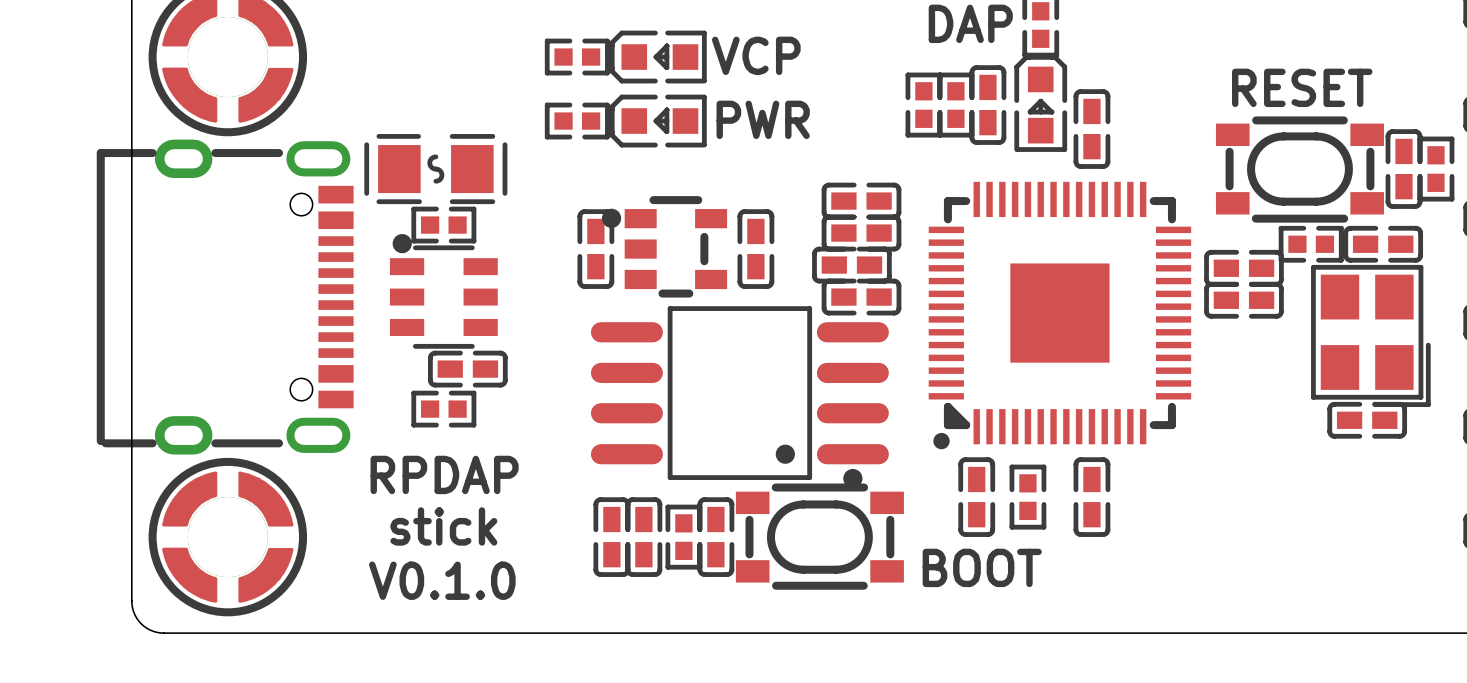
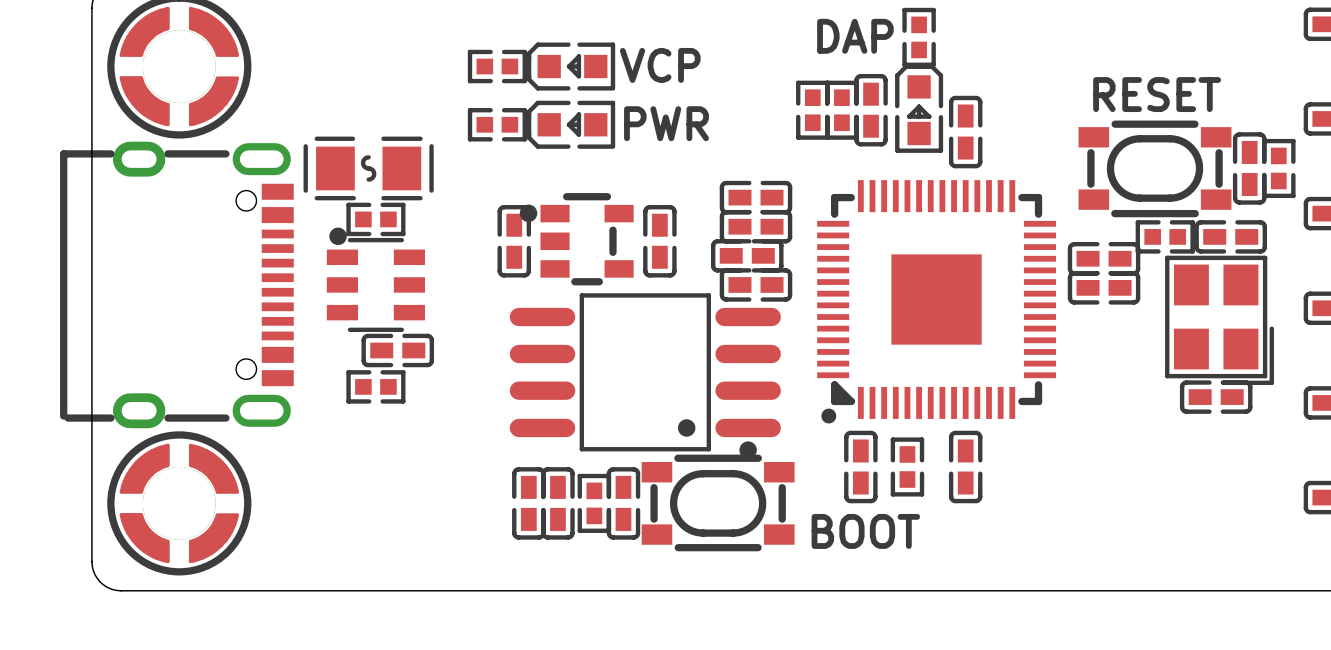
text: RPDAP (444, 474) -> none
text: stick (443, 526) -> none
text: V0.1.0 (442, 580) -> none

